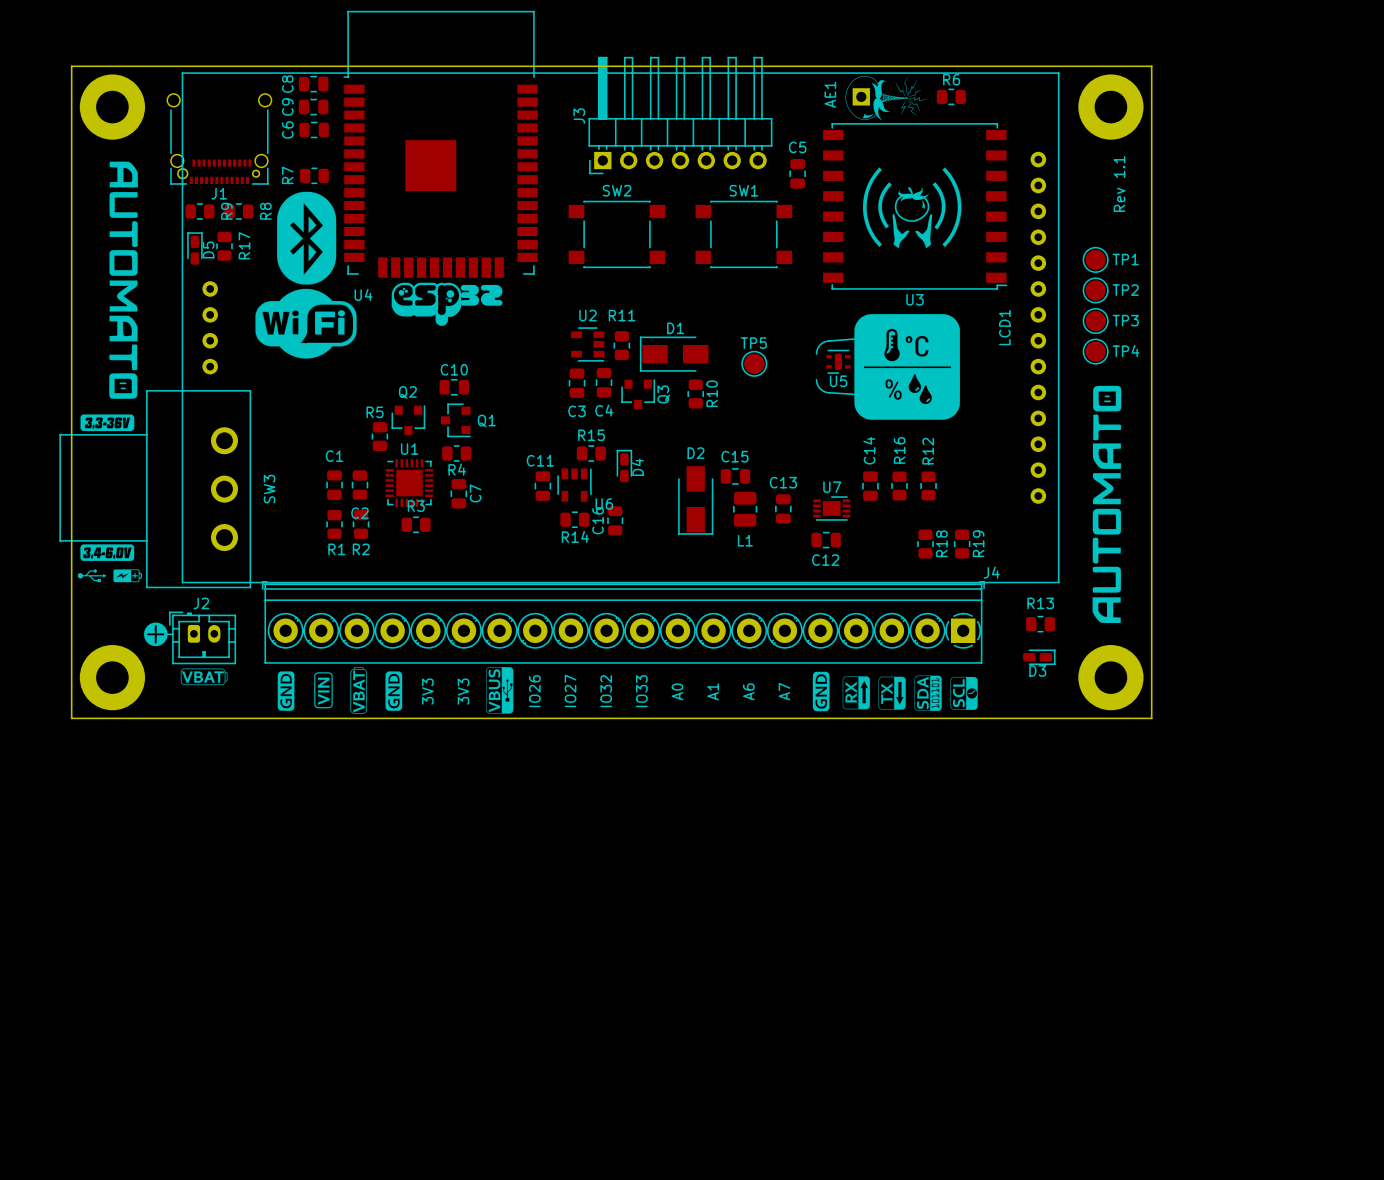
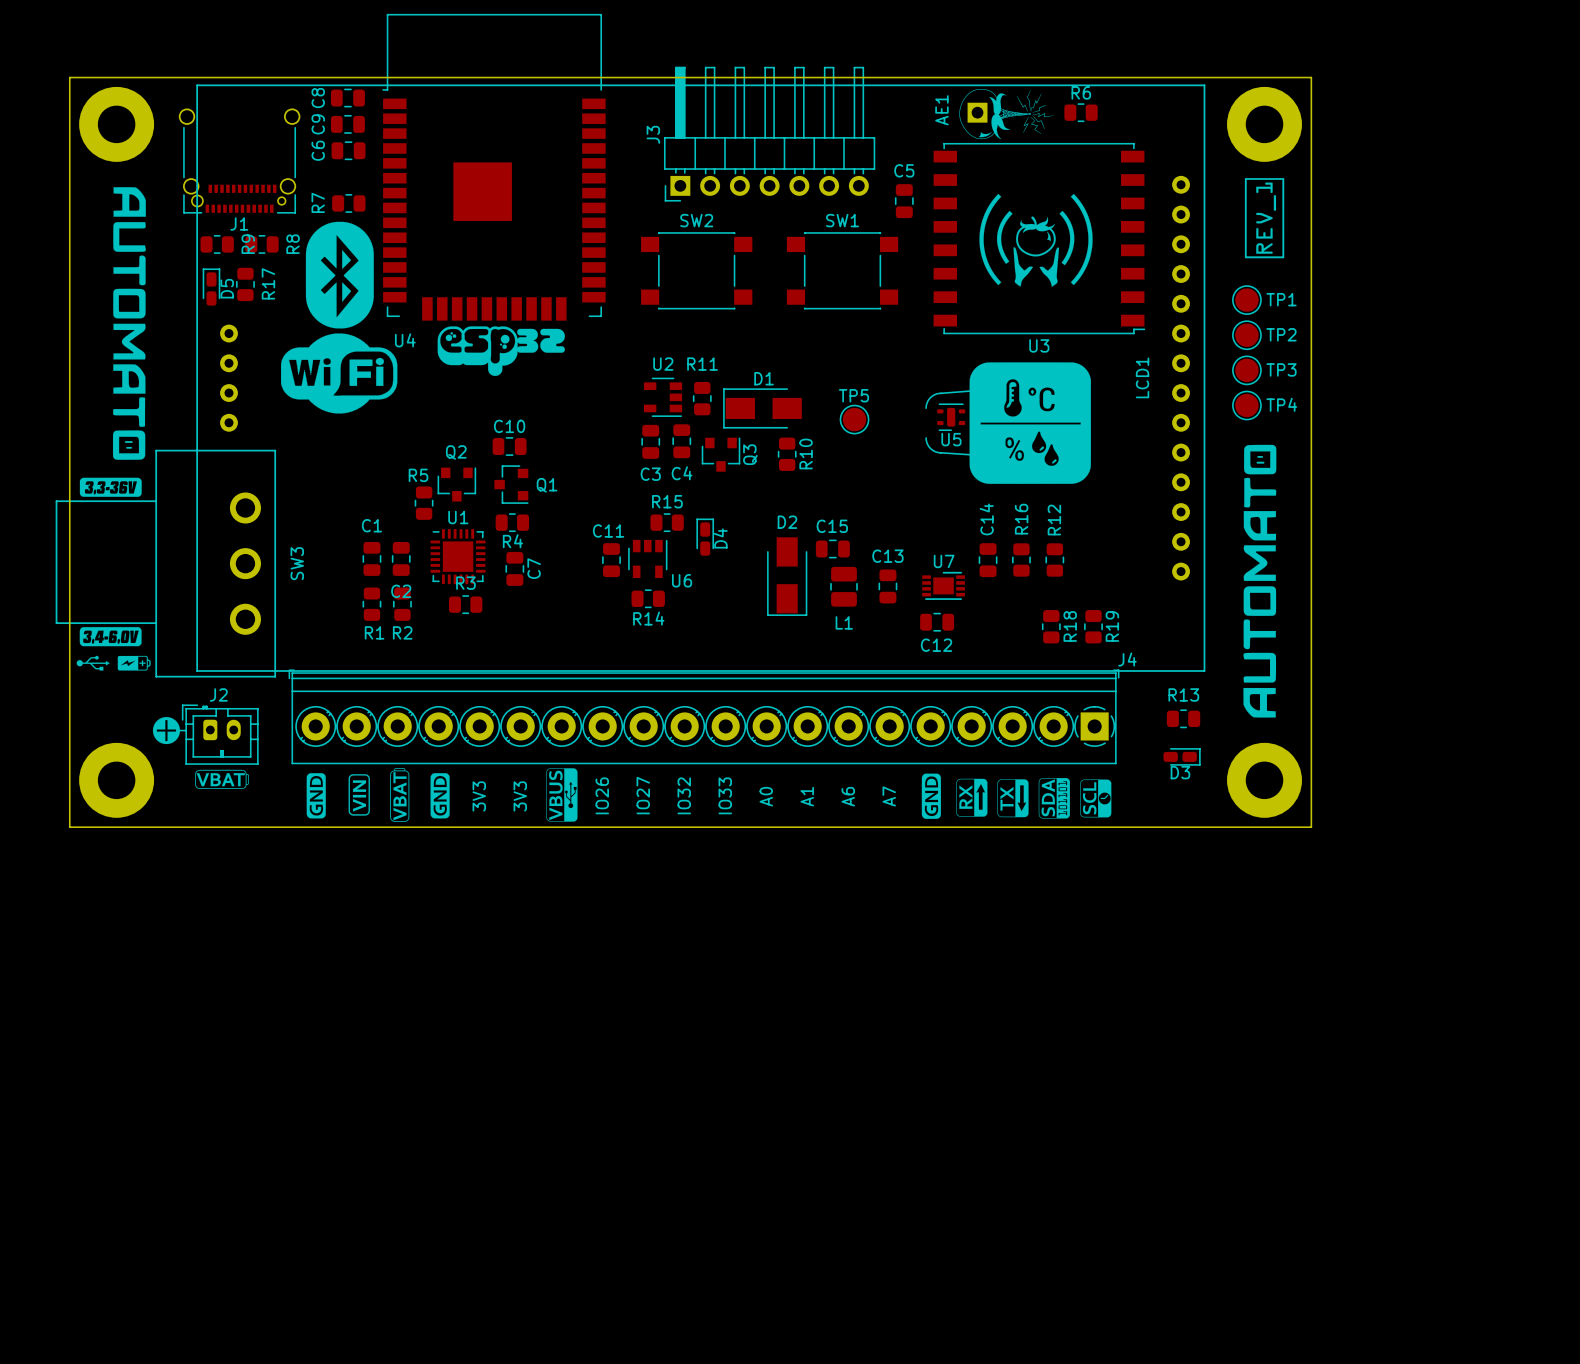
drawing: none -> [1244, 178, 1285, 259]
text: Rev 1.1 (1119, 184) -> none
C16: (615, 520) -> none

